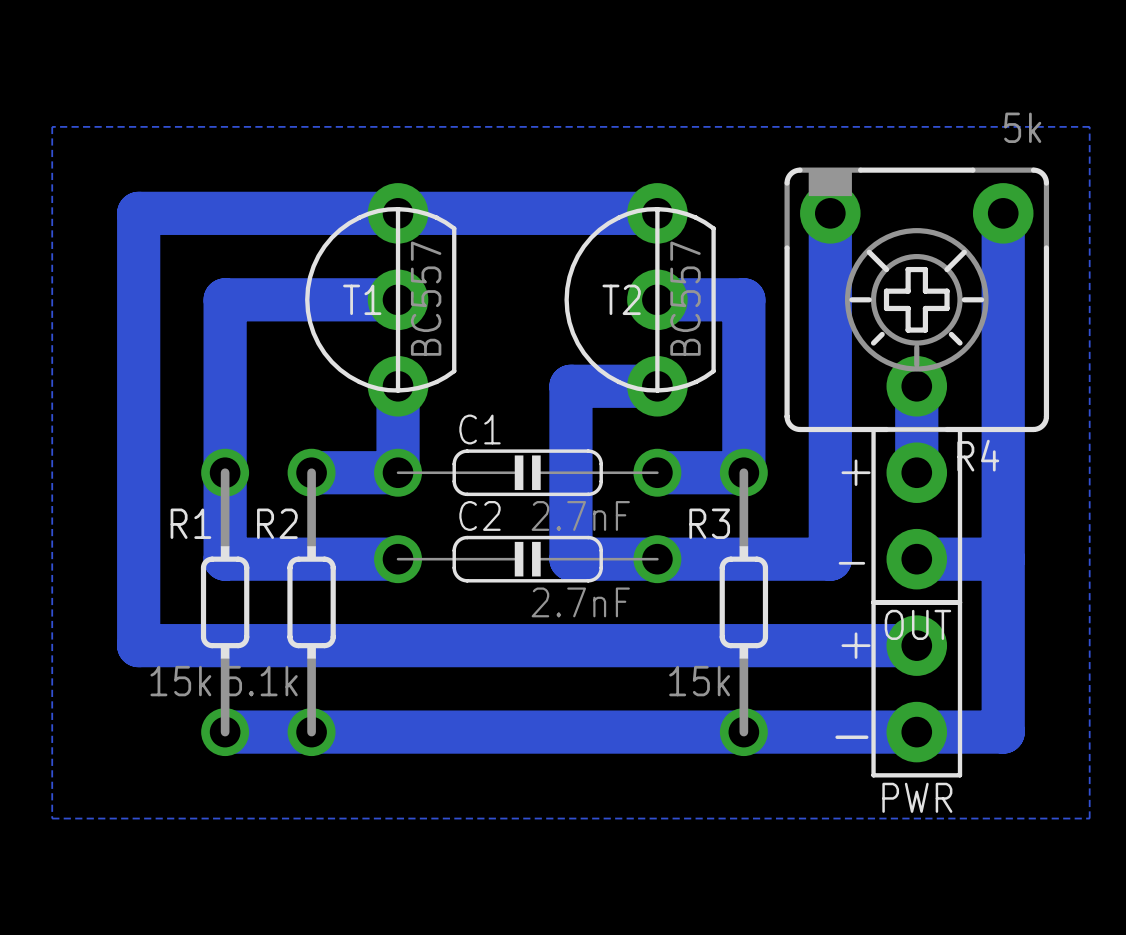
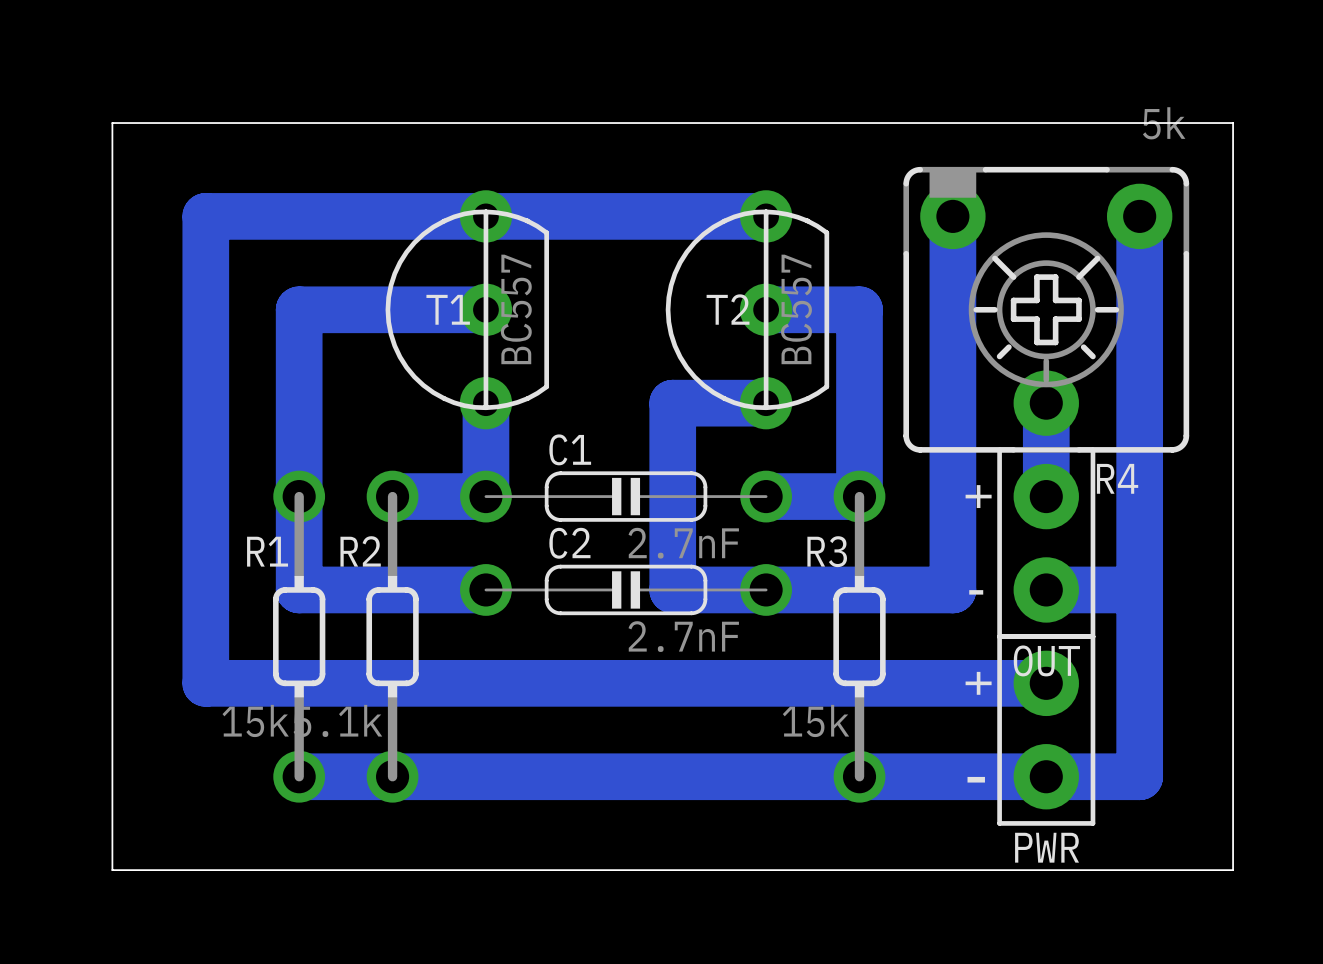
bottom zone outline: (52, 126) (52, 818) (1089, 818) (1089, 126) (52, 126) -> none
board edge: none -> (112, 123) (1233, 123) (1233, 870) (112, 870) (112, 123)
T1 footprint: [305, 183, 457, 417] -> [385, 190, 549, 430]
T2 footprint: [564, 183, 716, 417] -> [665, 190, 830, 430]

